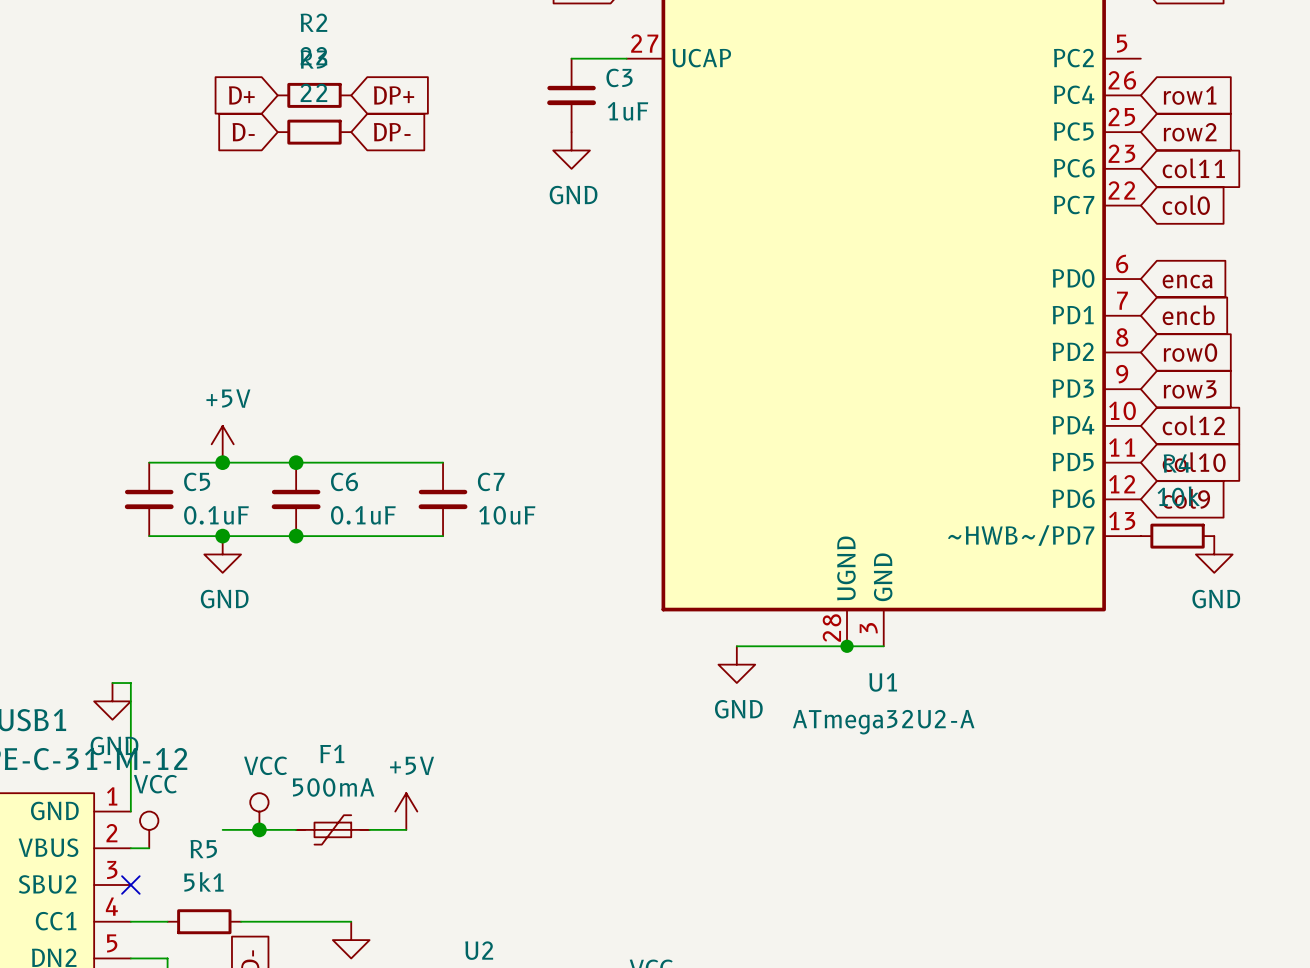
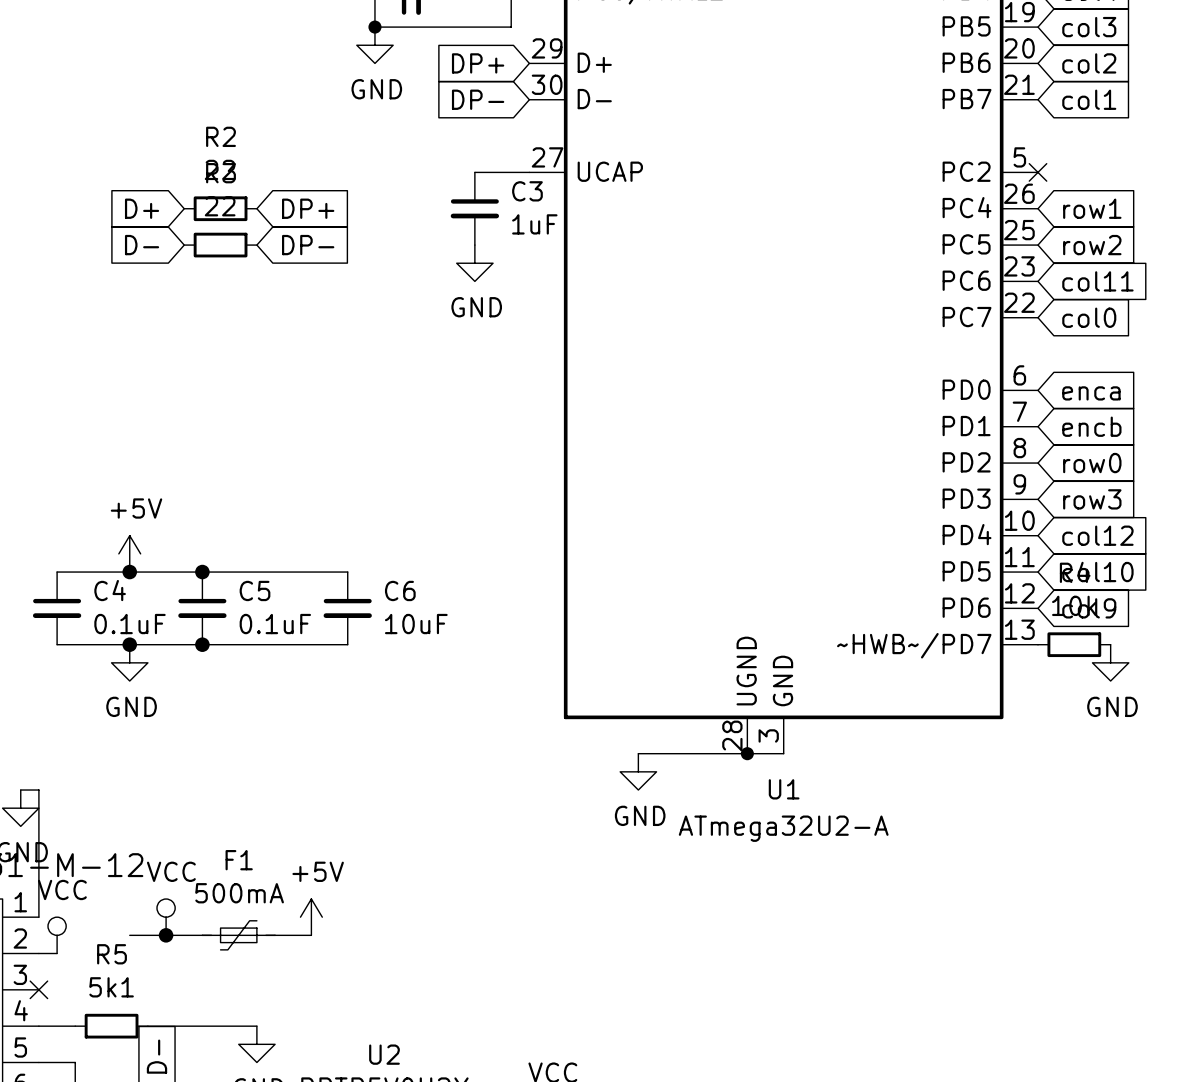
no-connect mark: none -> (1038, 172)
C5 name: C5 (197, 481) -> C4 (110, 590)
C6 name: C6 (344, 481) -> C5 (254, 590)
C7 name: C7 (491, 481) -> C6 (400, 590)

